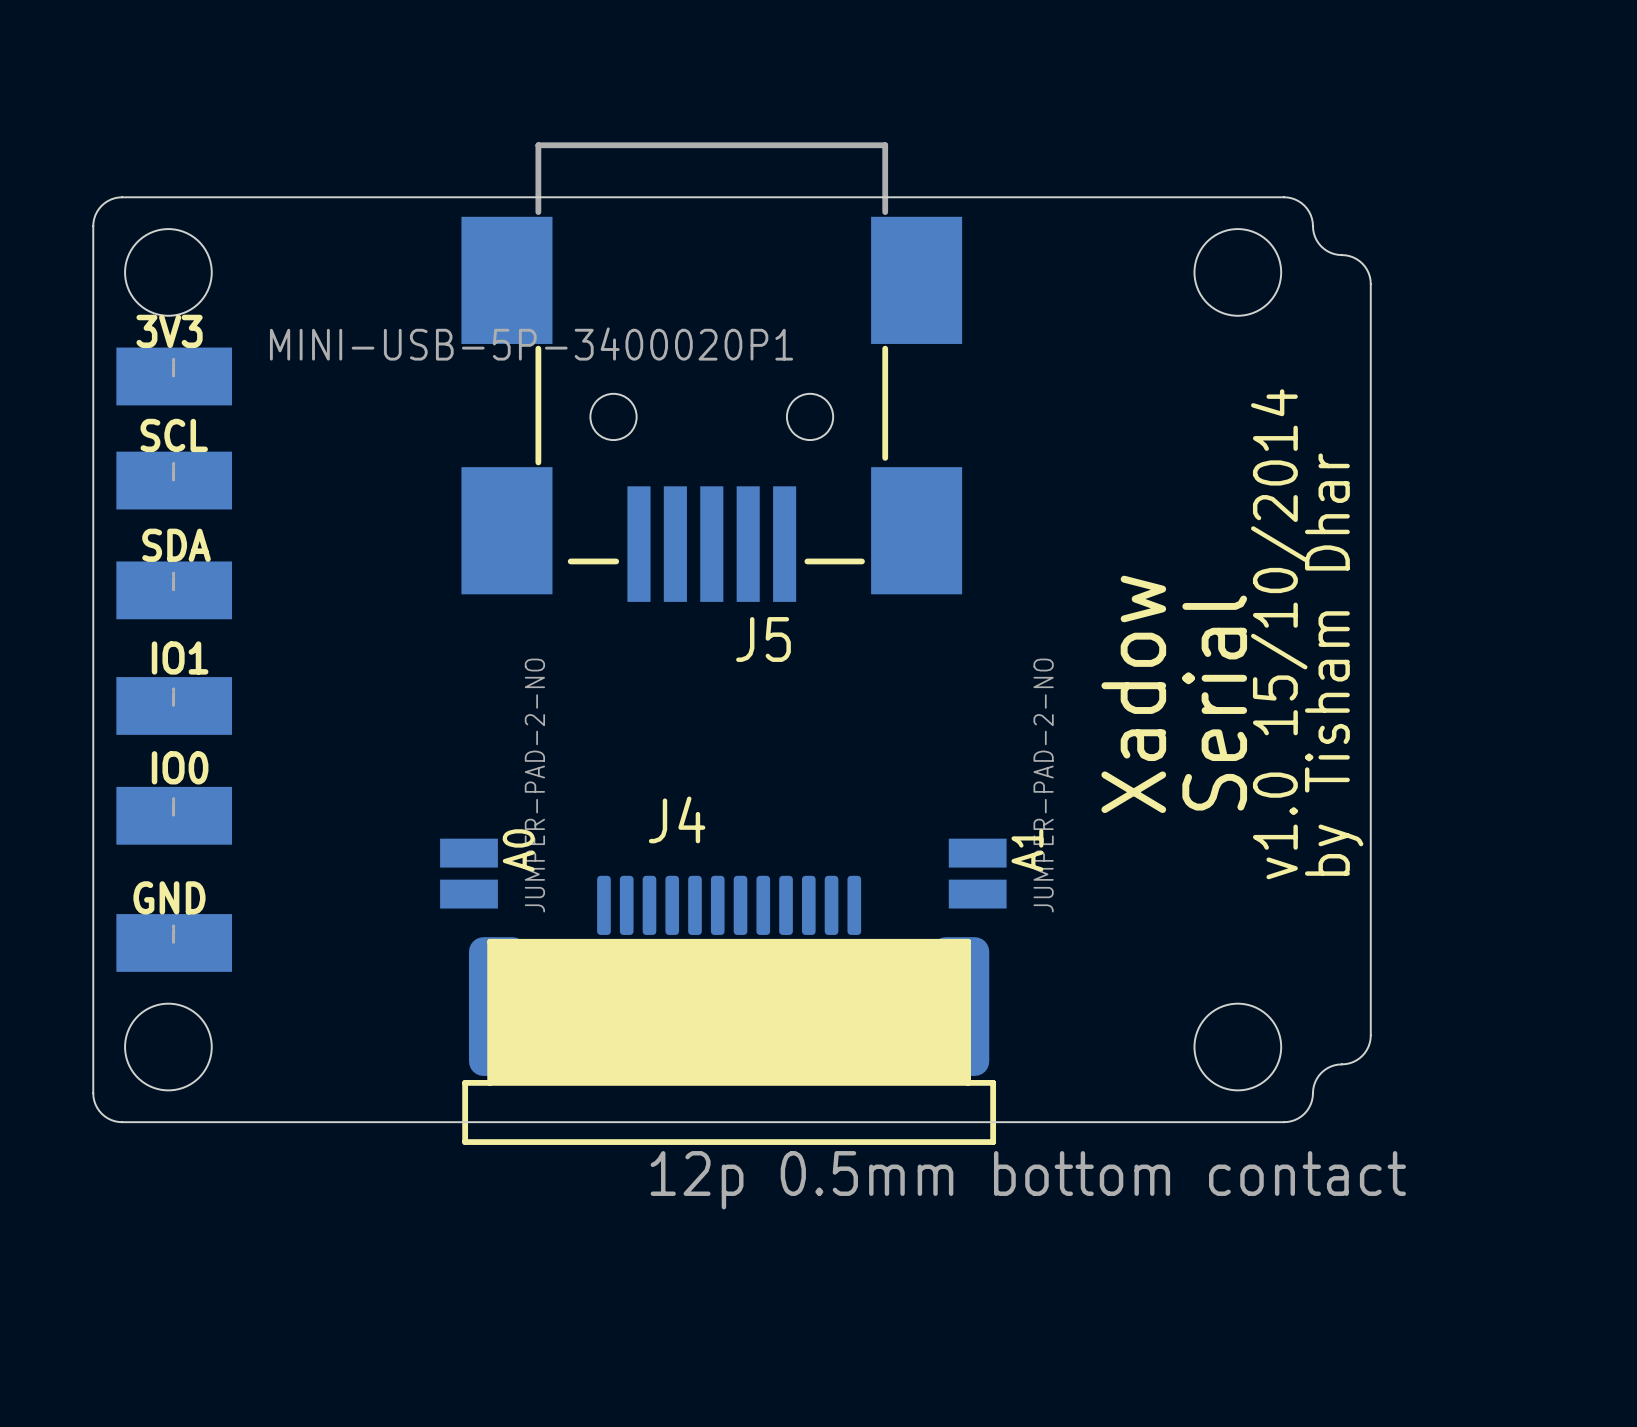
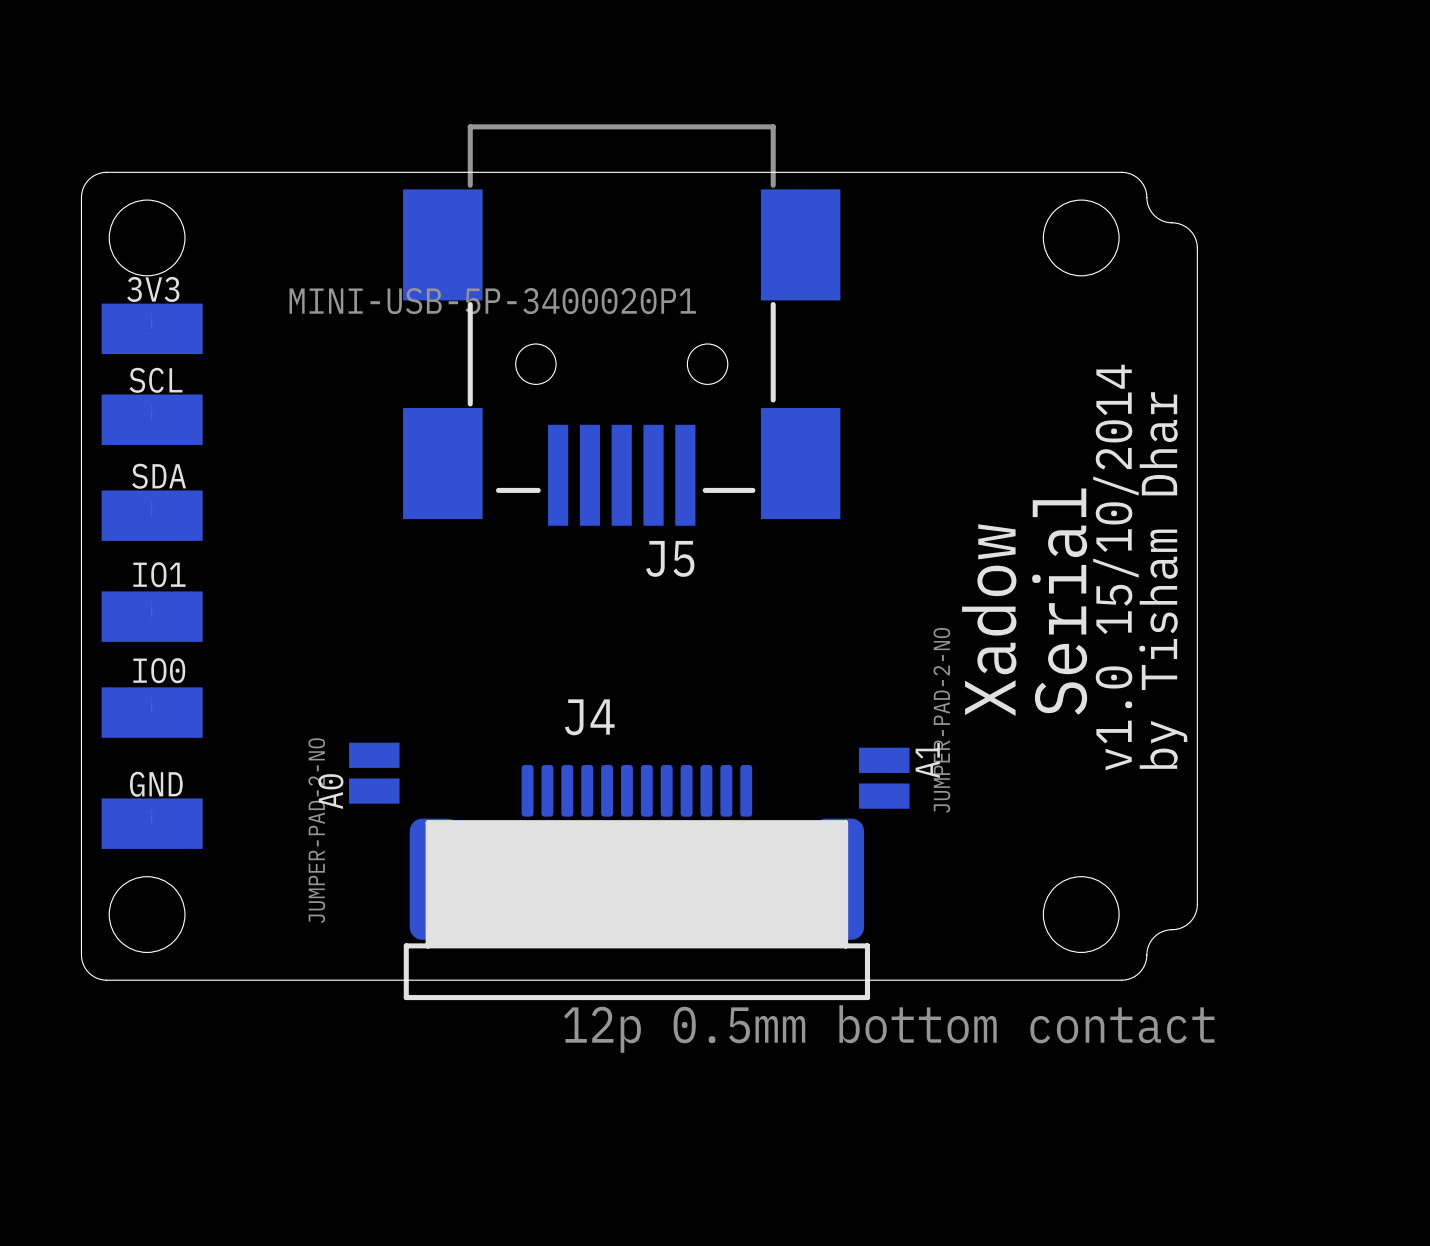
A0 value position: JUMPER-PAD-2-NO (534, 785) -> JUMPER-PAD-2-NO (316, 830)
A0 name position: A0 (518, 850) -> A0 (330, 791)
A0 position: (469, 873) -> (374, 773)
A1 position: (977, 873) -> (884, 778)

